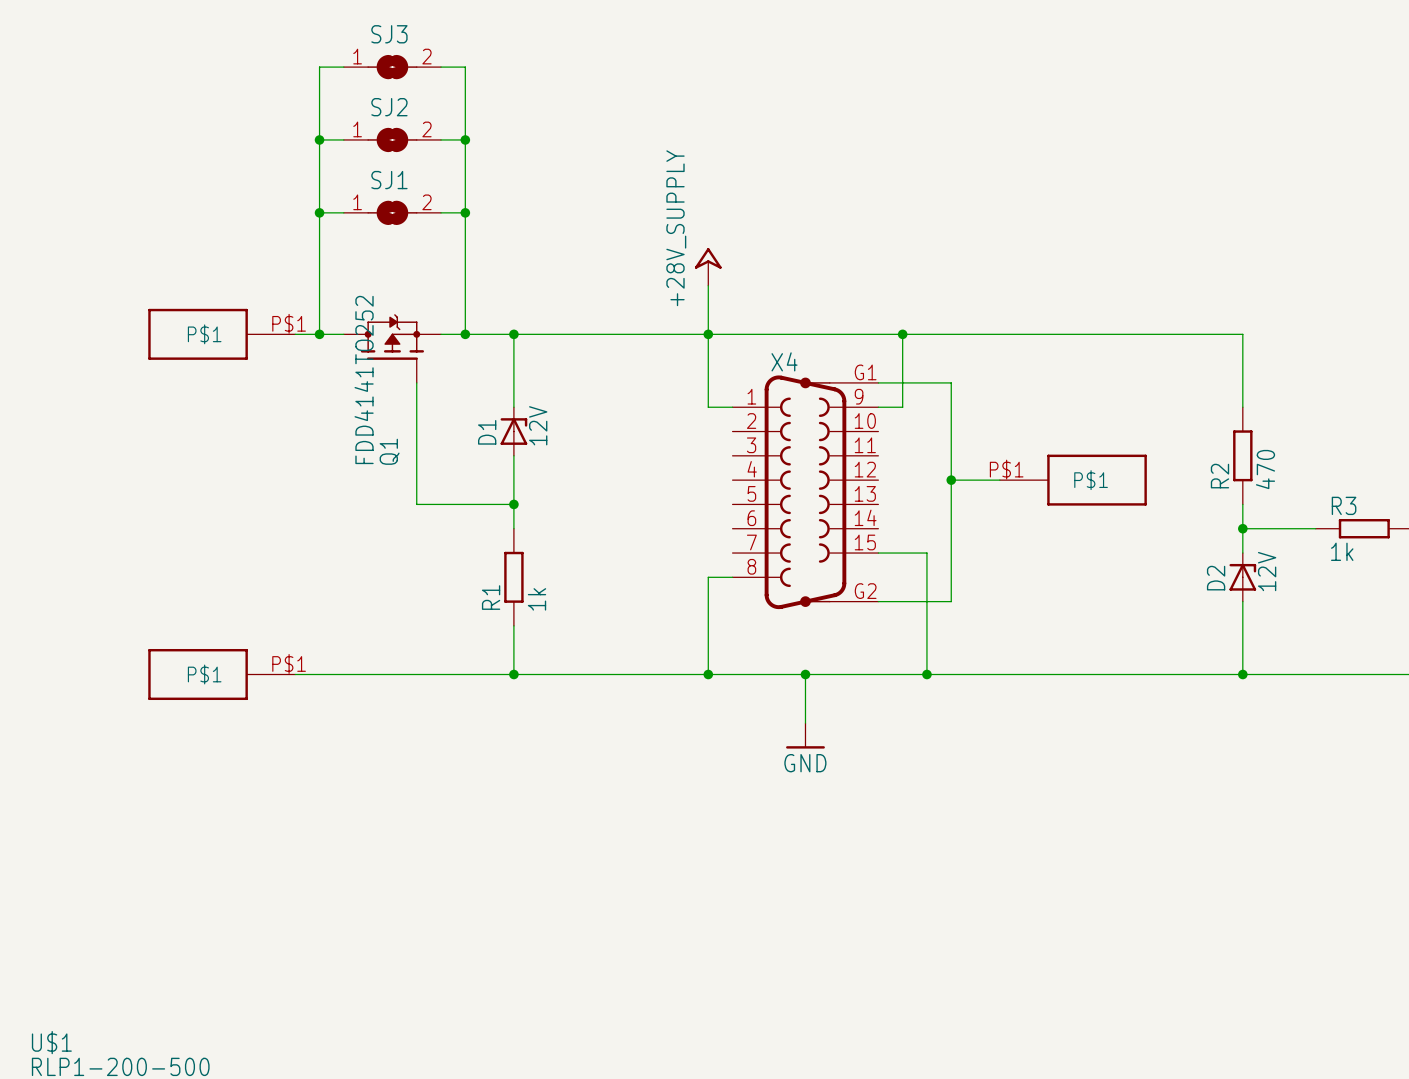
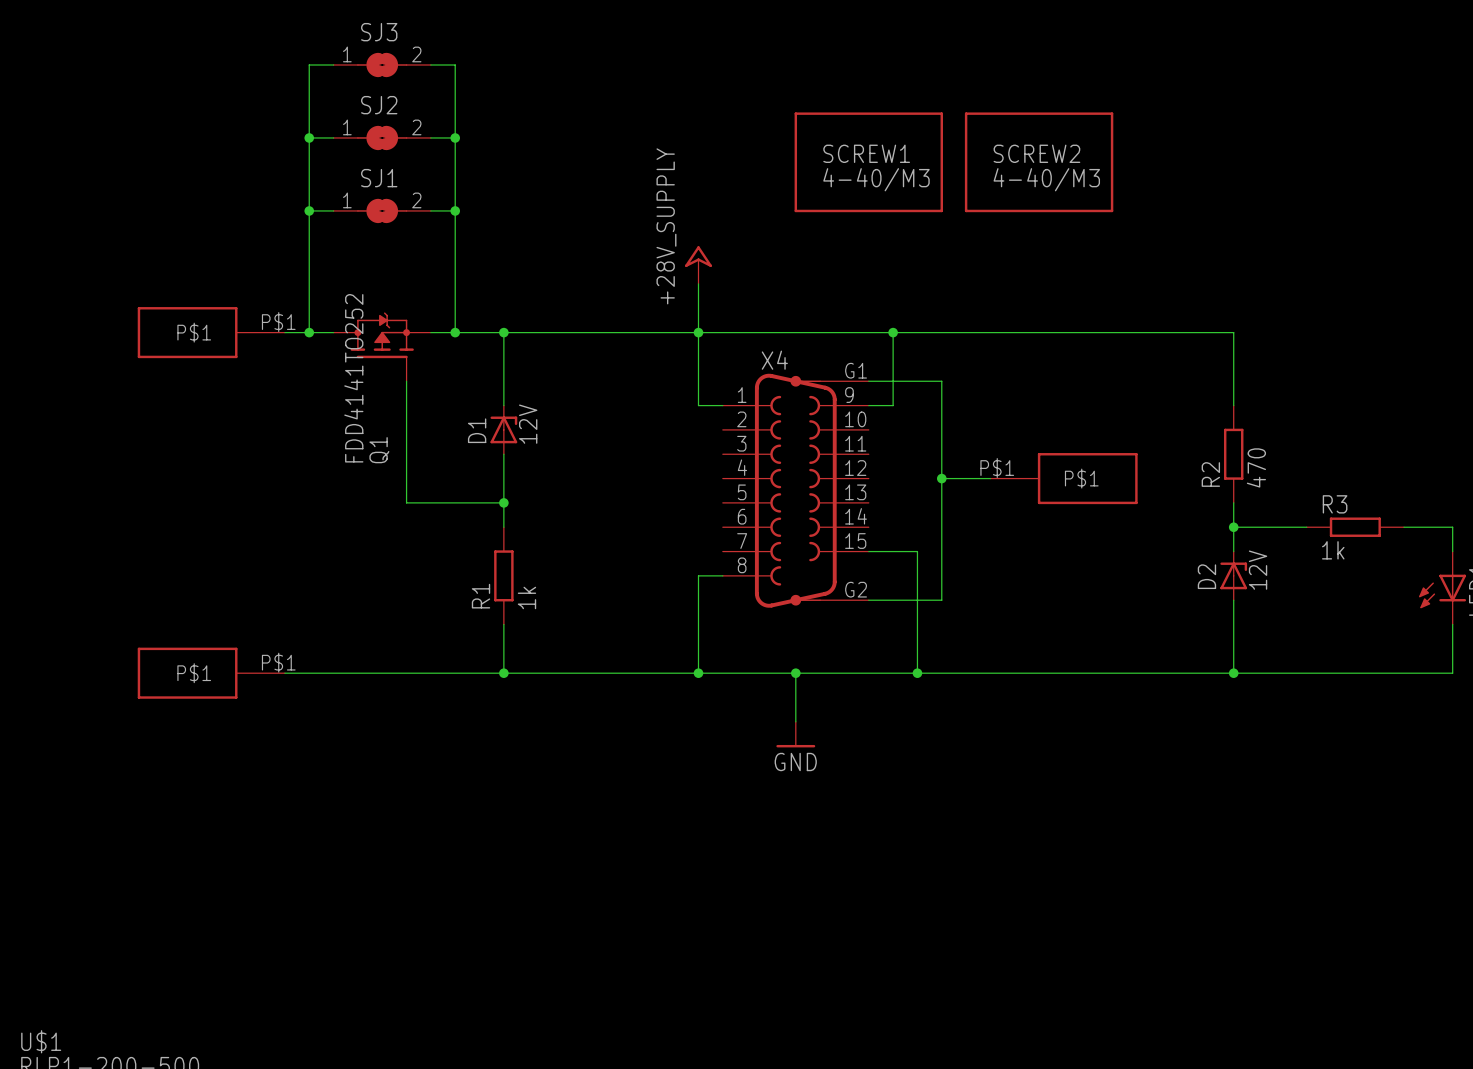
SCREW1: none -> 4-40/M3 (868, 162)
SCREW2: none -> 4-40/M3 (1039, 162)

